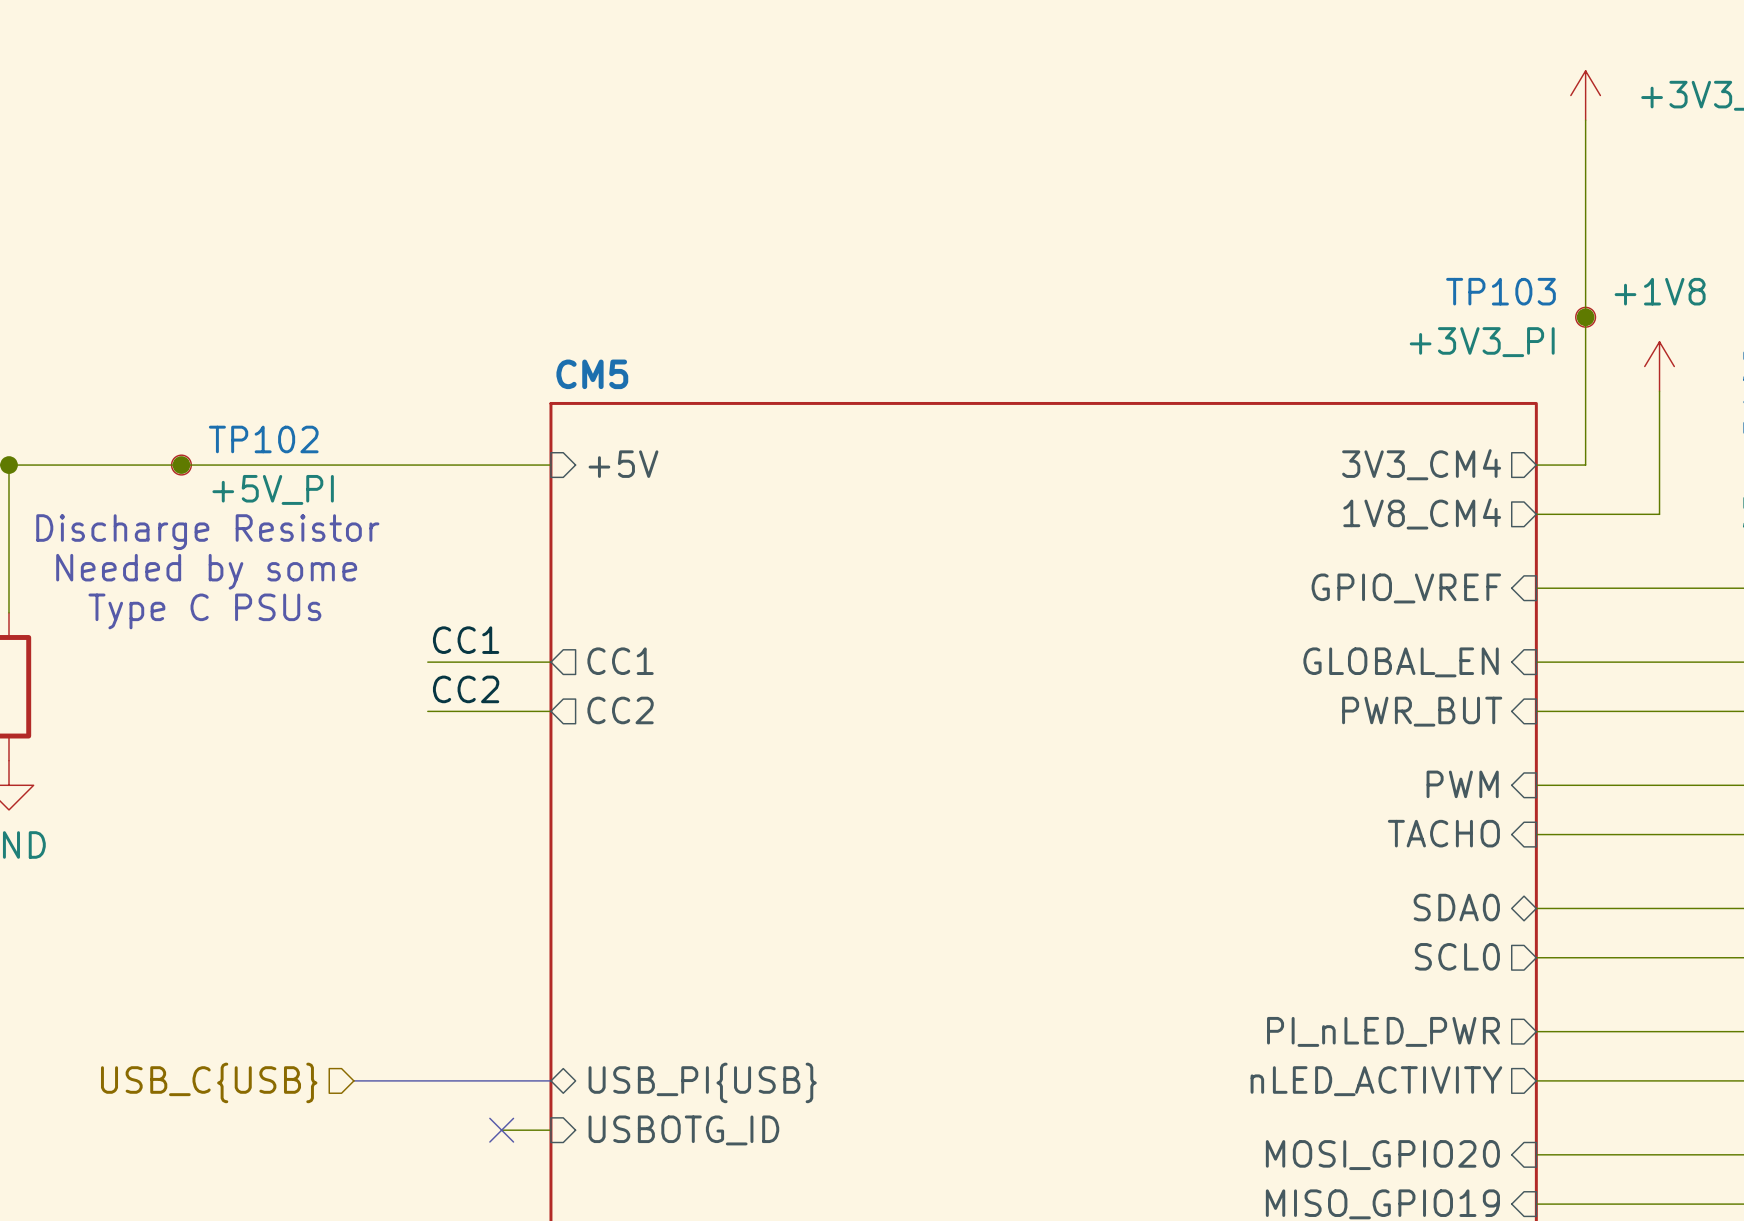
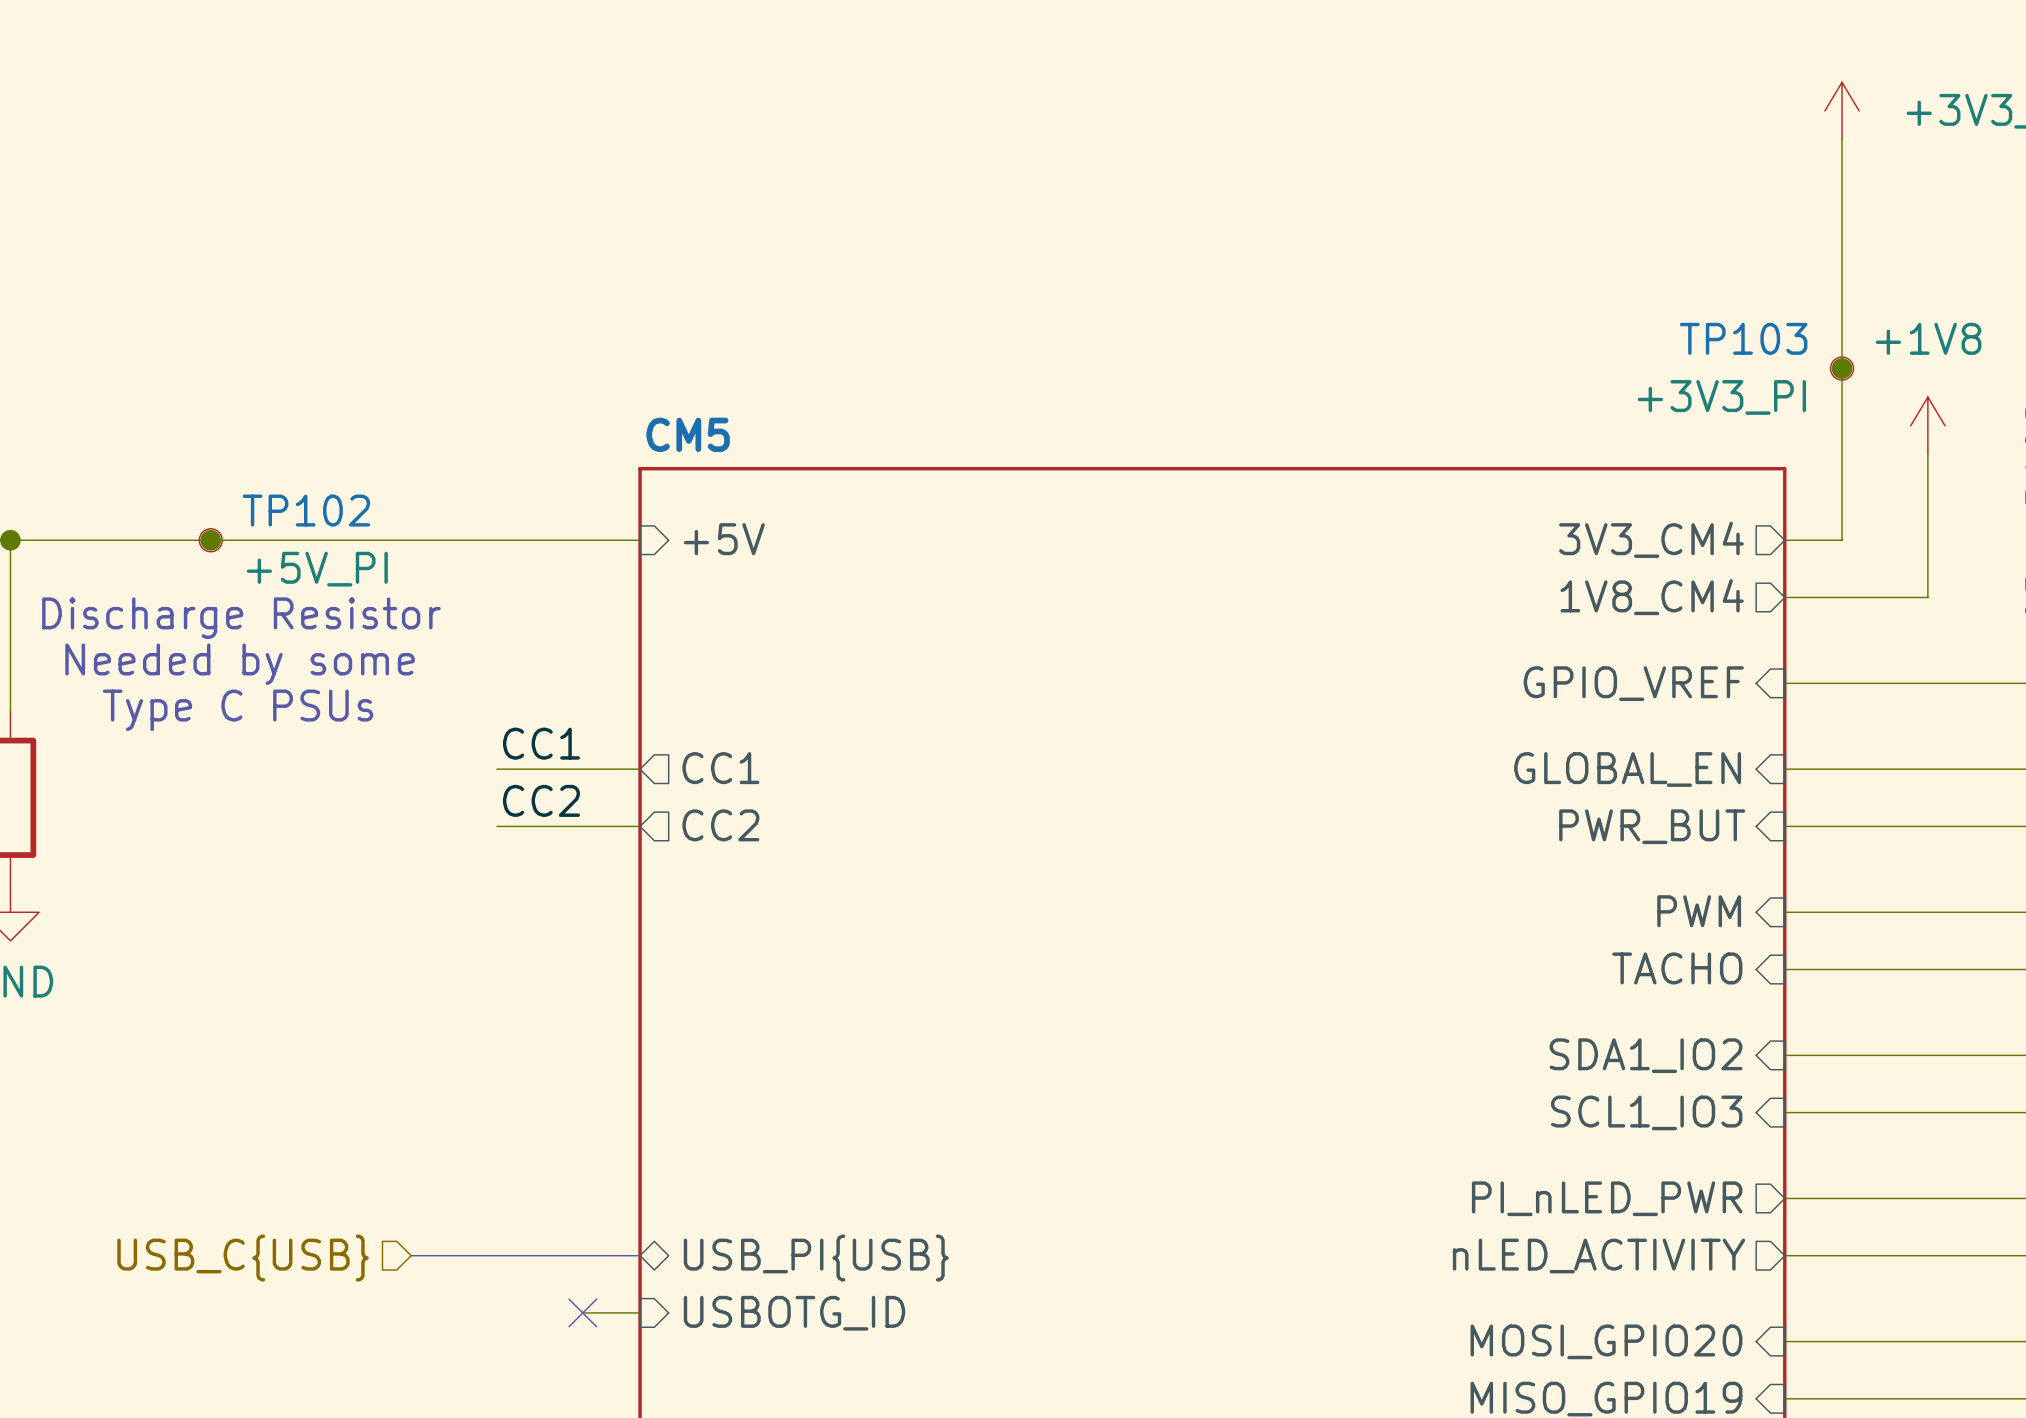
sheet pin shape: bidirectional (1456, 907) -> input (1646, 1055)
sheet pin: SDA0 (1456, 907) -> SDA1_IO2 (1646, 1055)
sheet pin shape: output (1457, 956) -> input (1646, 1112)
sheet pin: SCL0 (1457, 956) -> SCL1_IO3 (1646, 1112)

